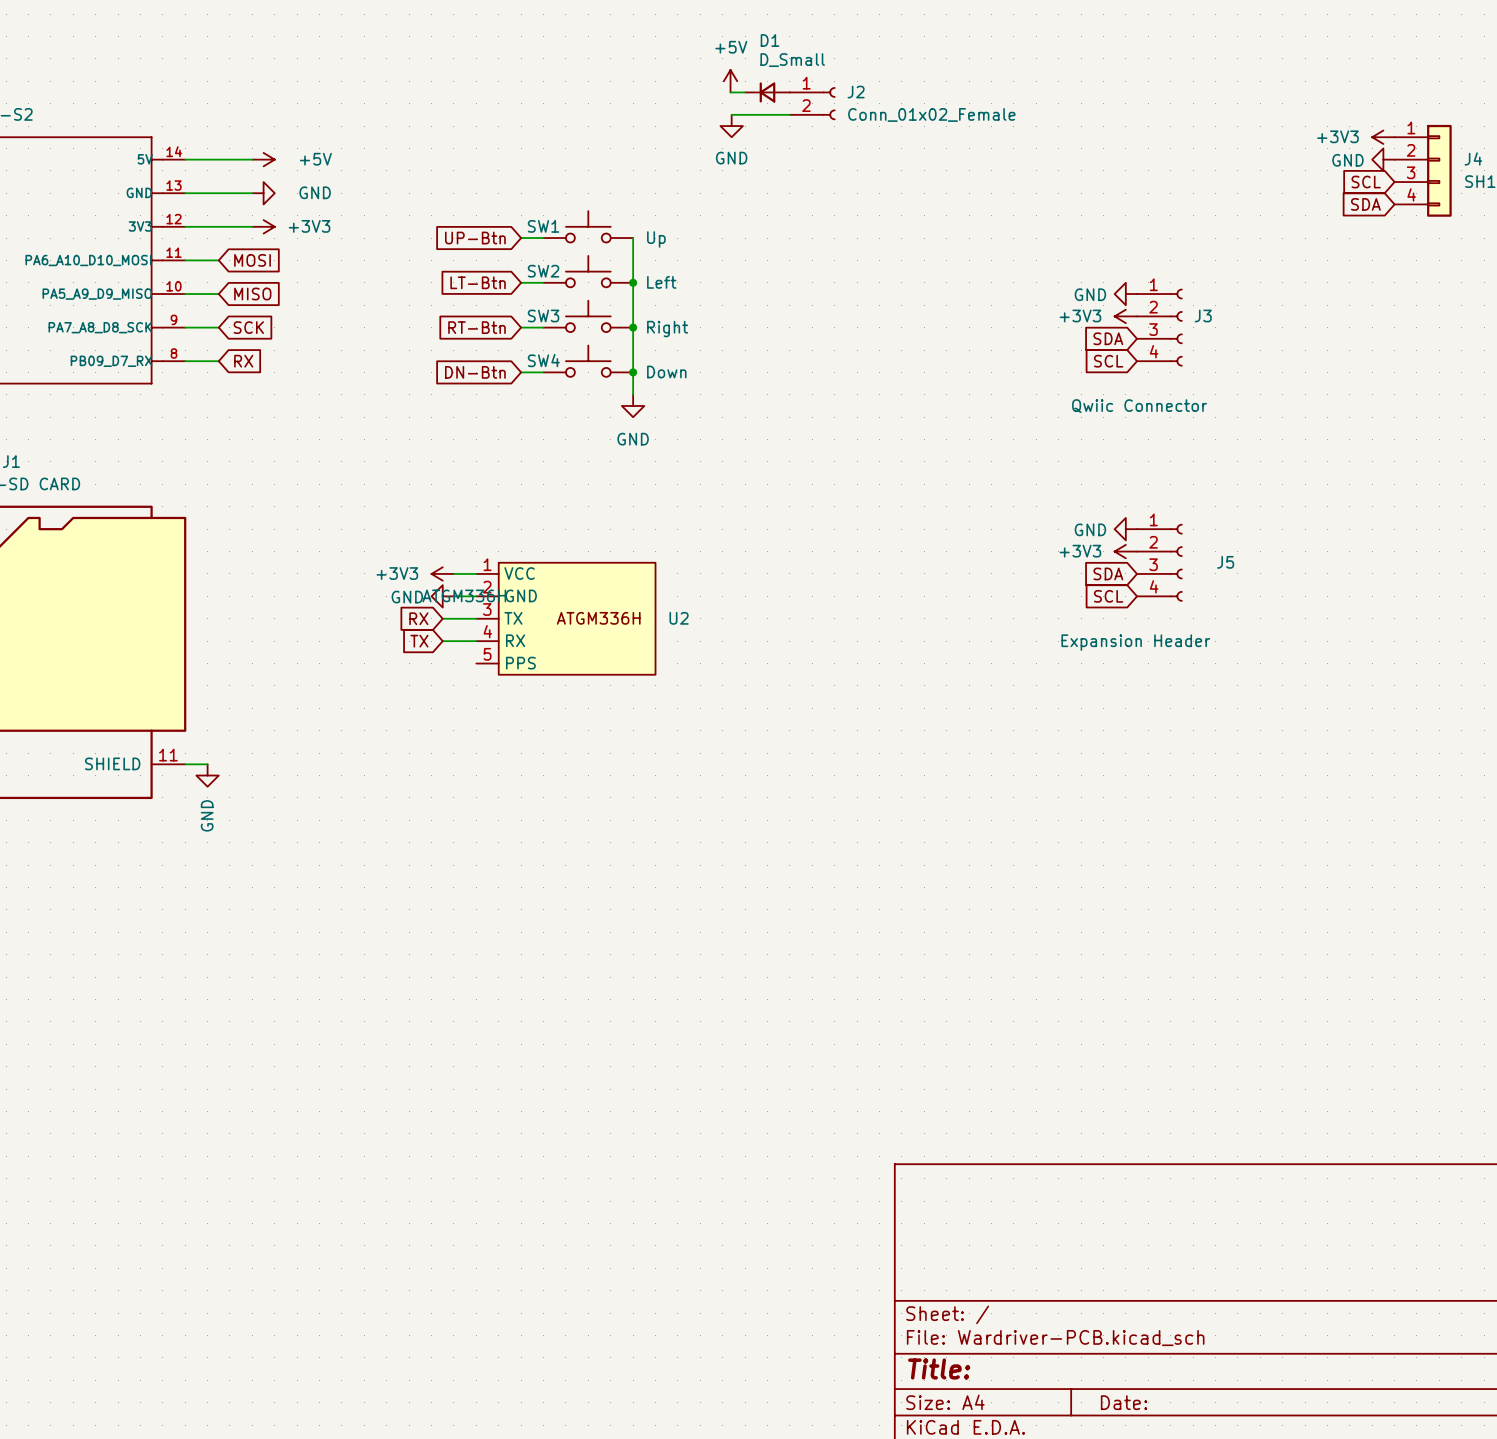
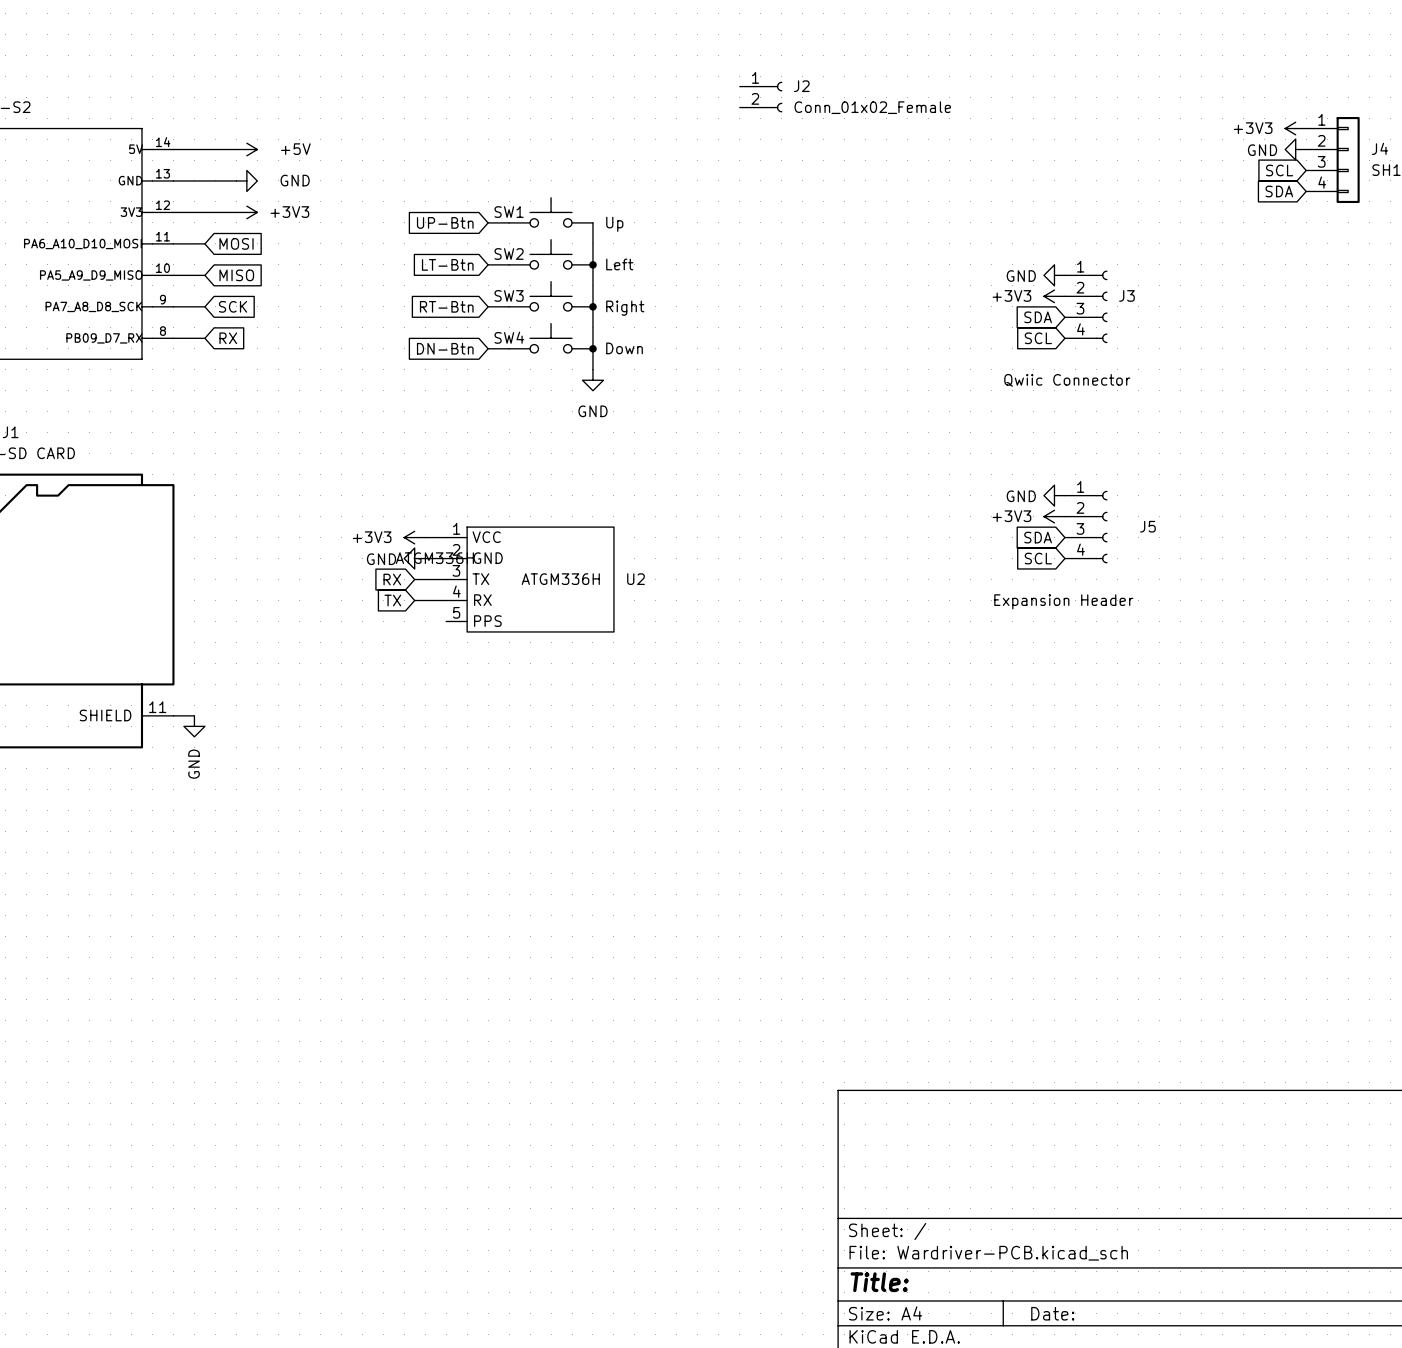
power symbol: +5V (730, 81) -> none
wire: (730, 92) (745, 92) -> none
D1: D_Small (767, 92) -> none
wire: (731, 114) (789, 114) -> none
power symbol: GND (731, 126) -> none

